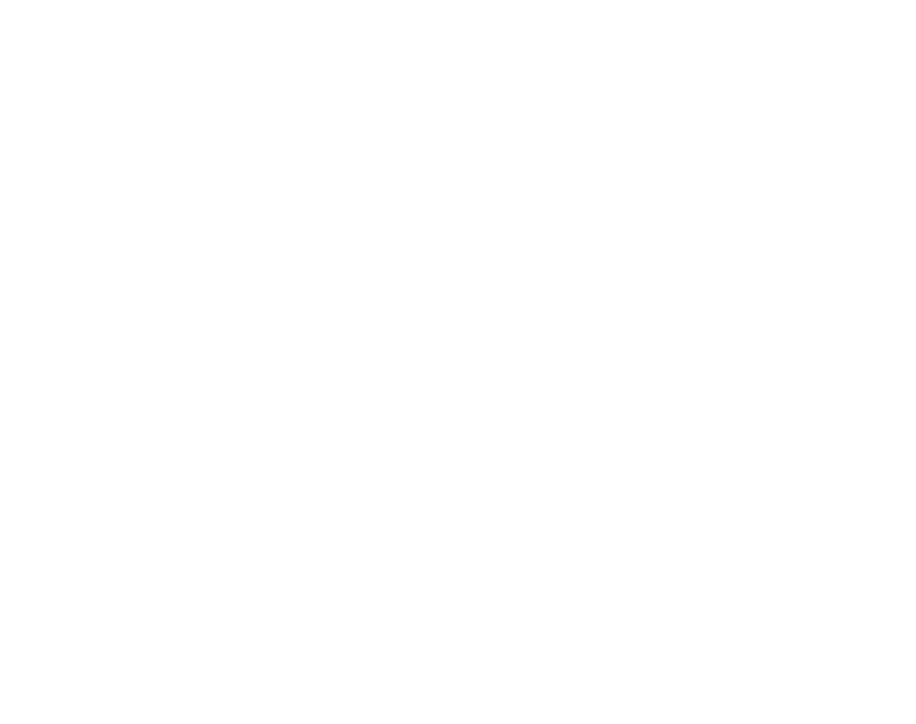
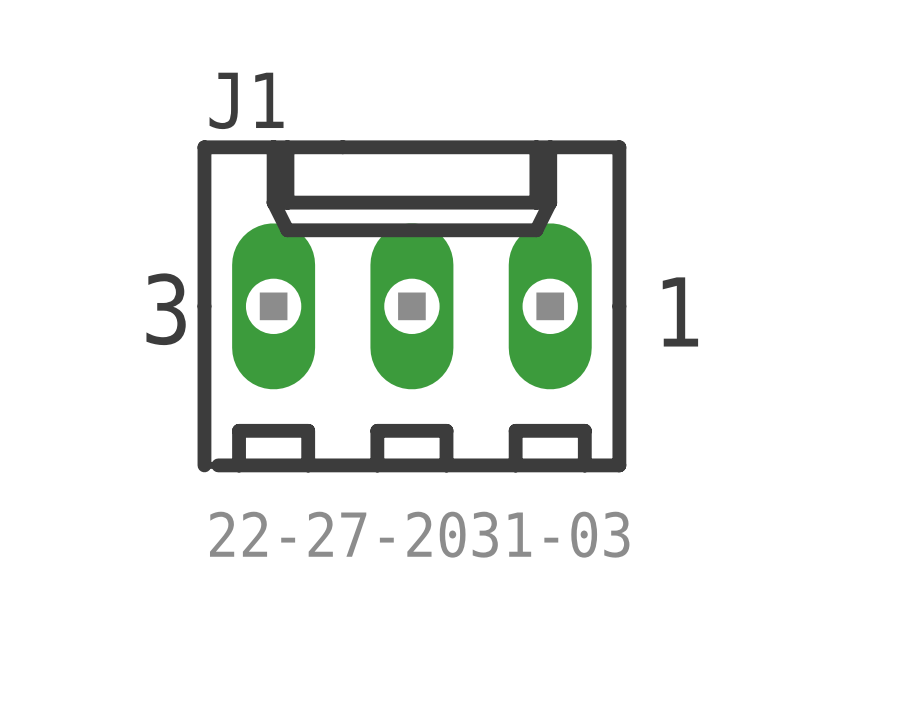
J1: none -> 22-27-2031-03 (411, 306)

